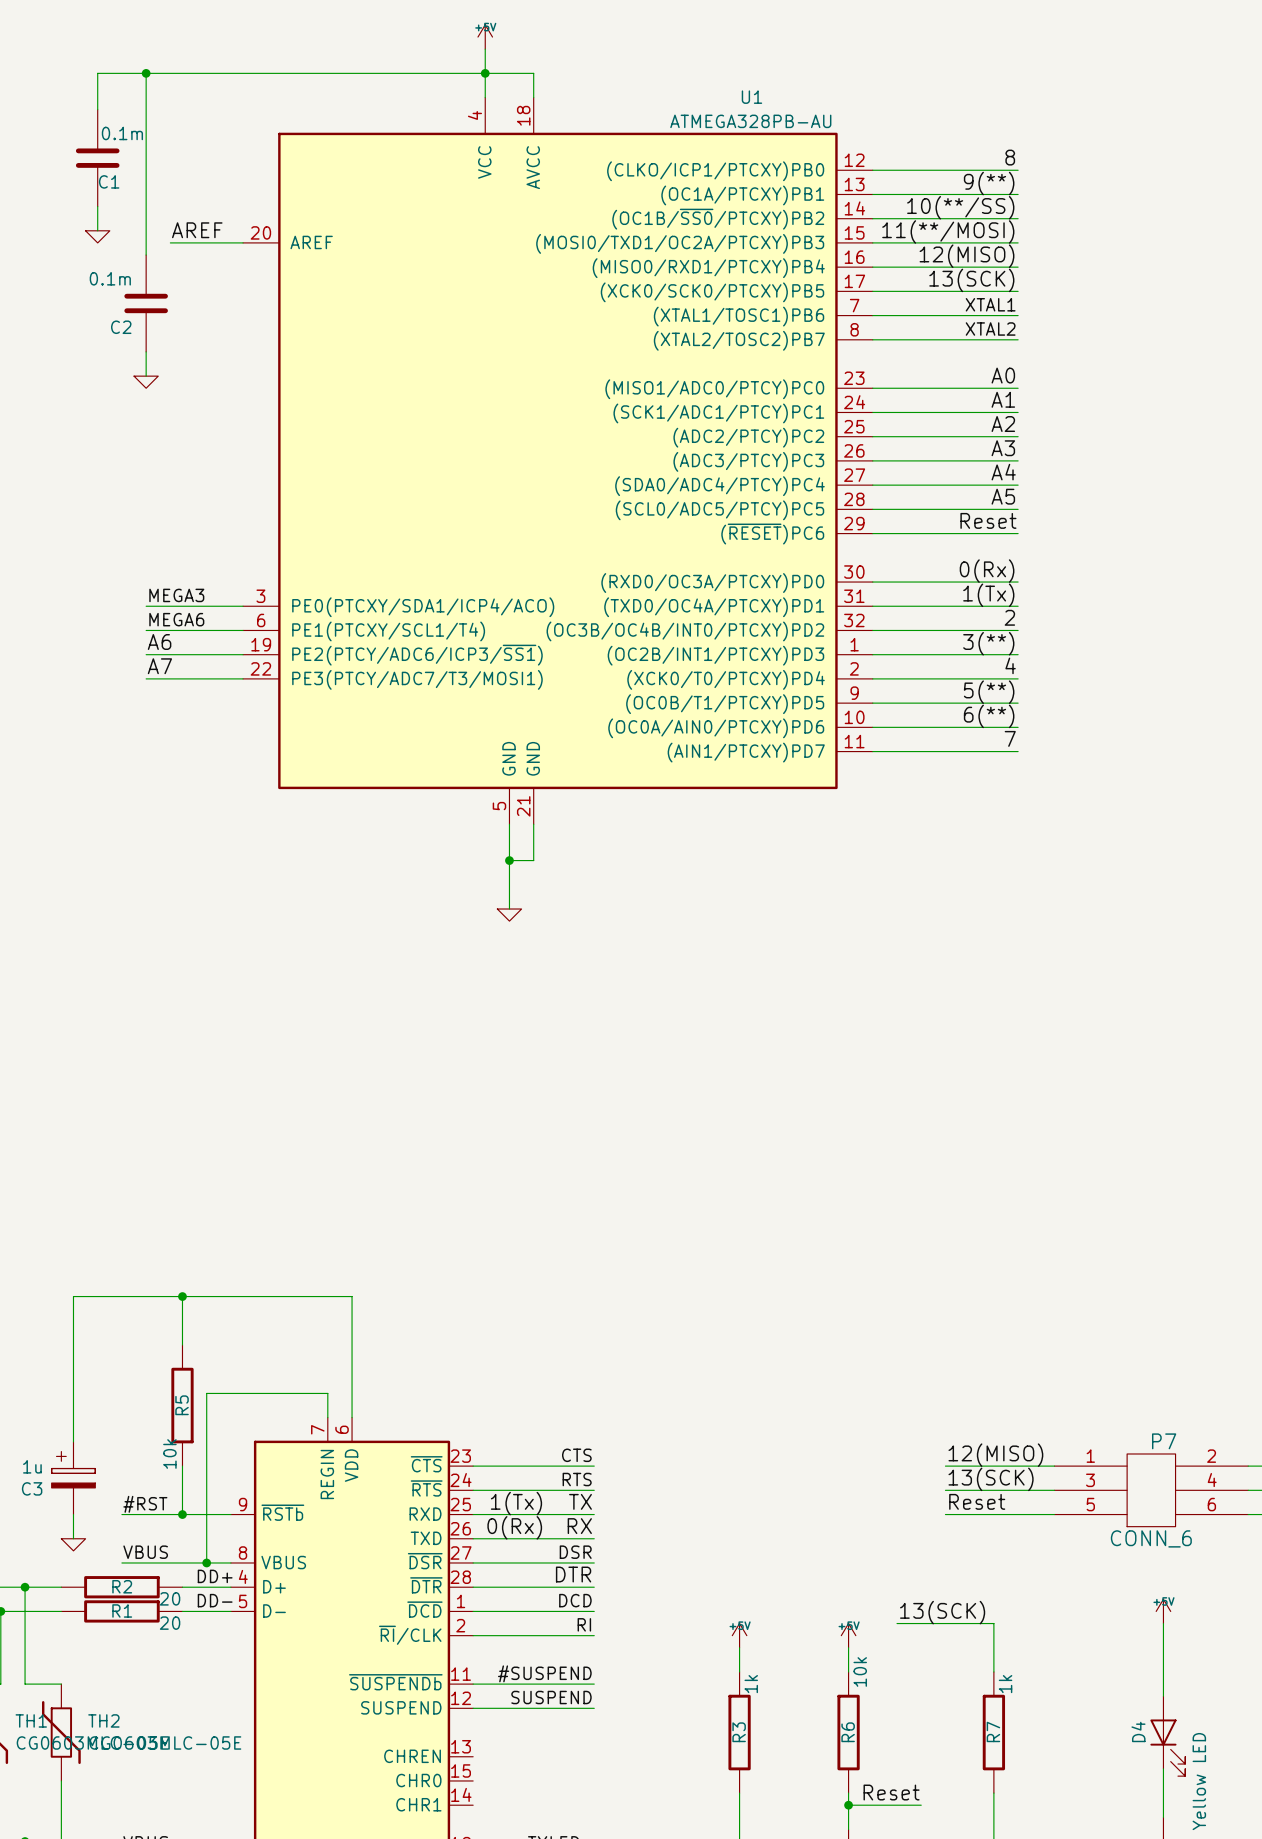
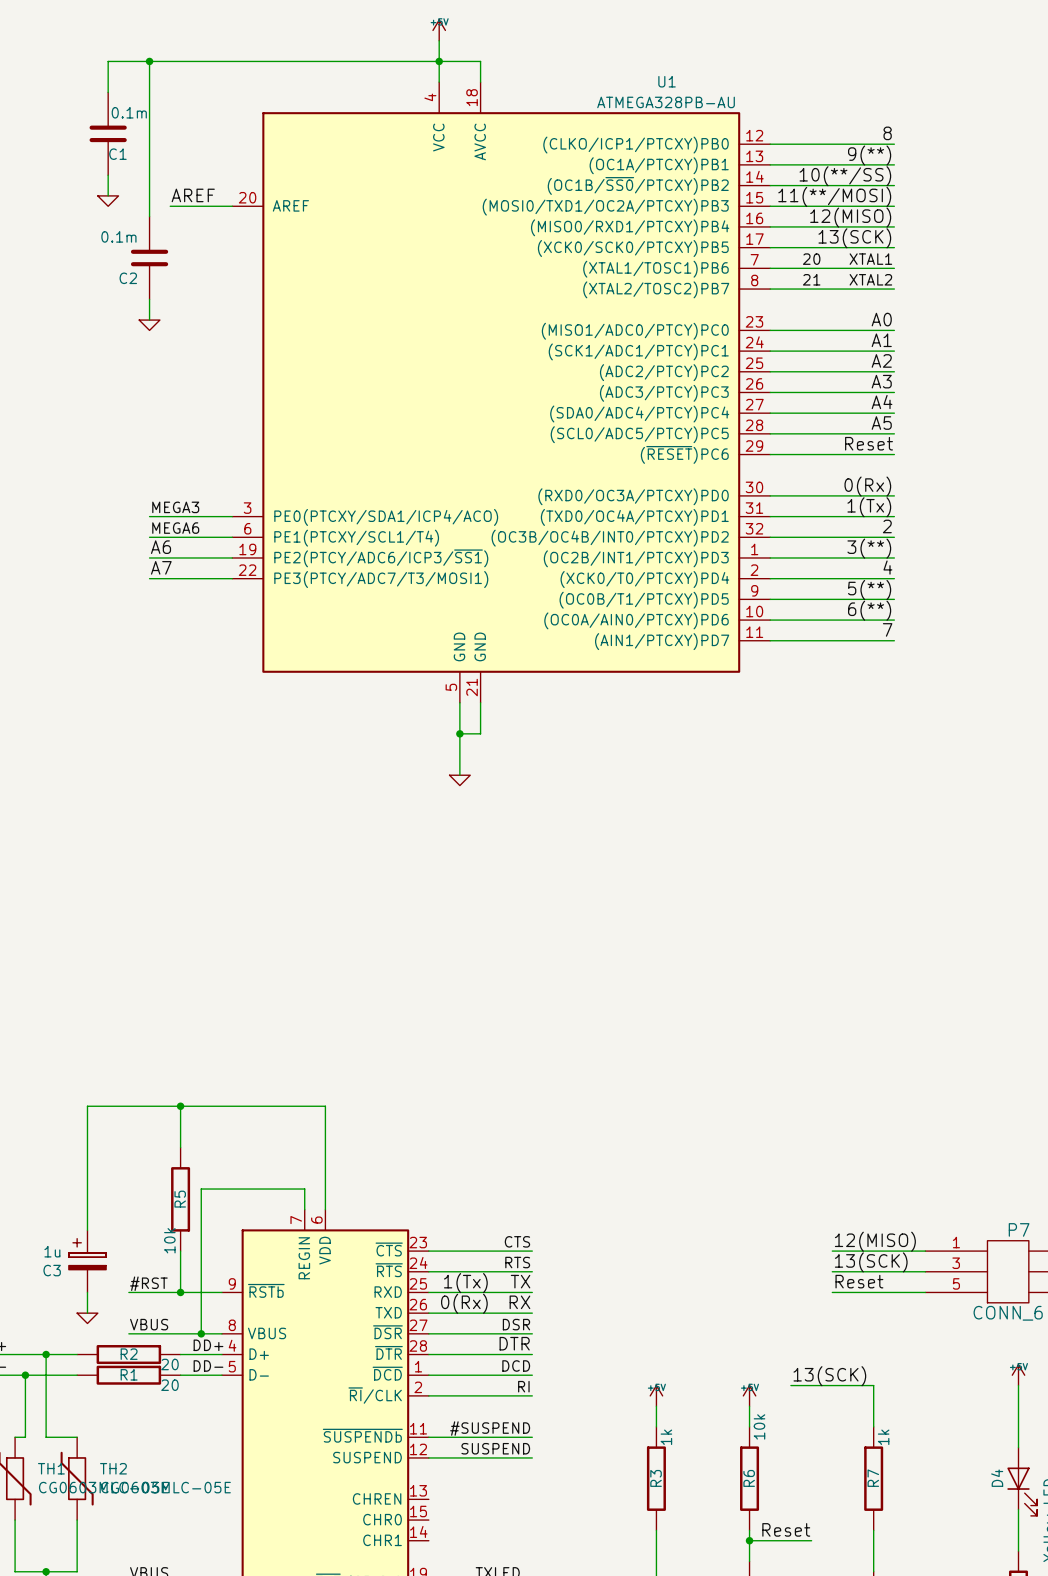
label: none -> 20 (811, 259)
label: none -> 21 (811, 279)

